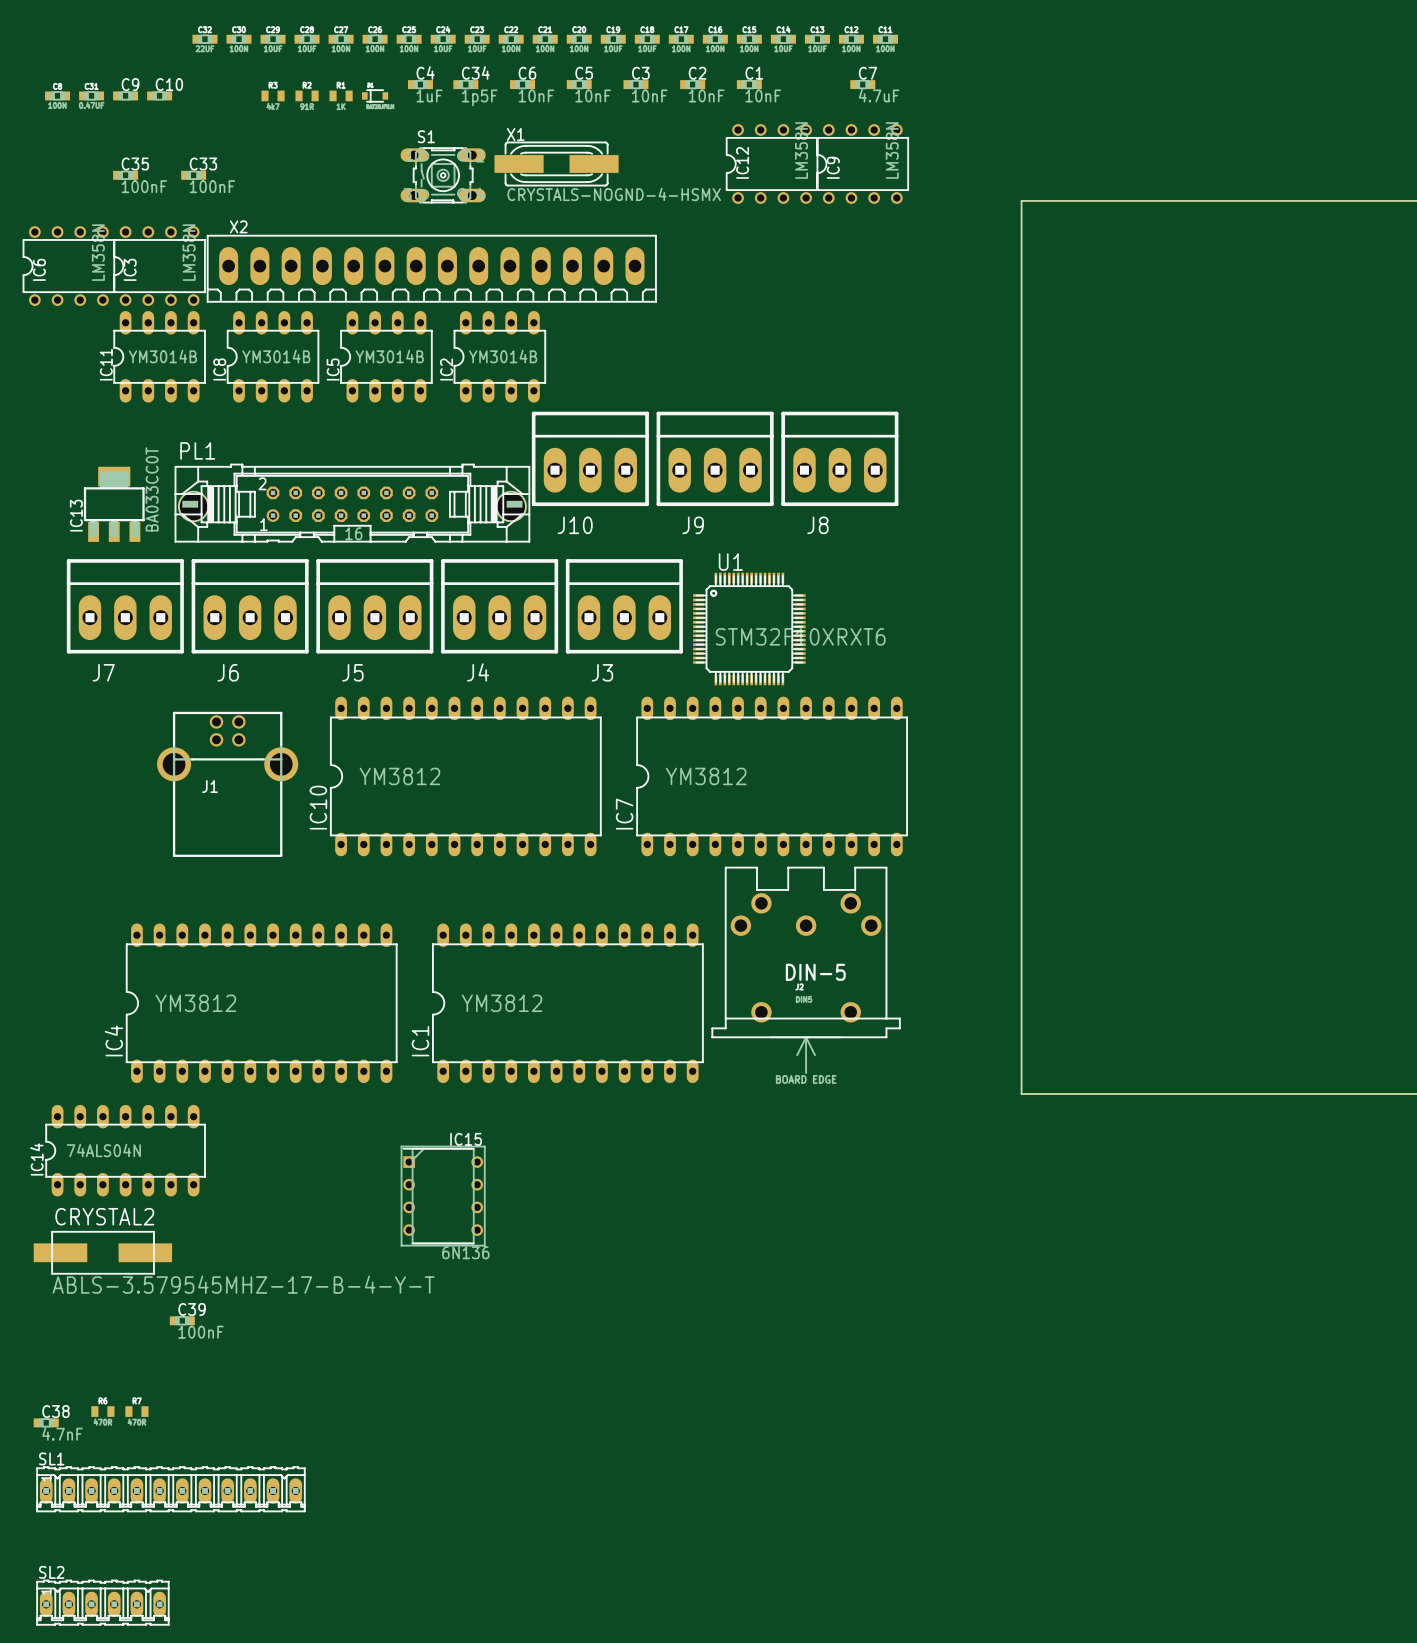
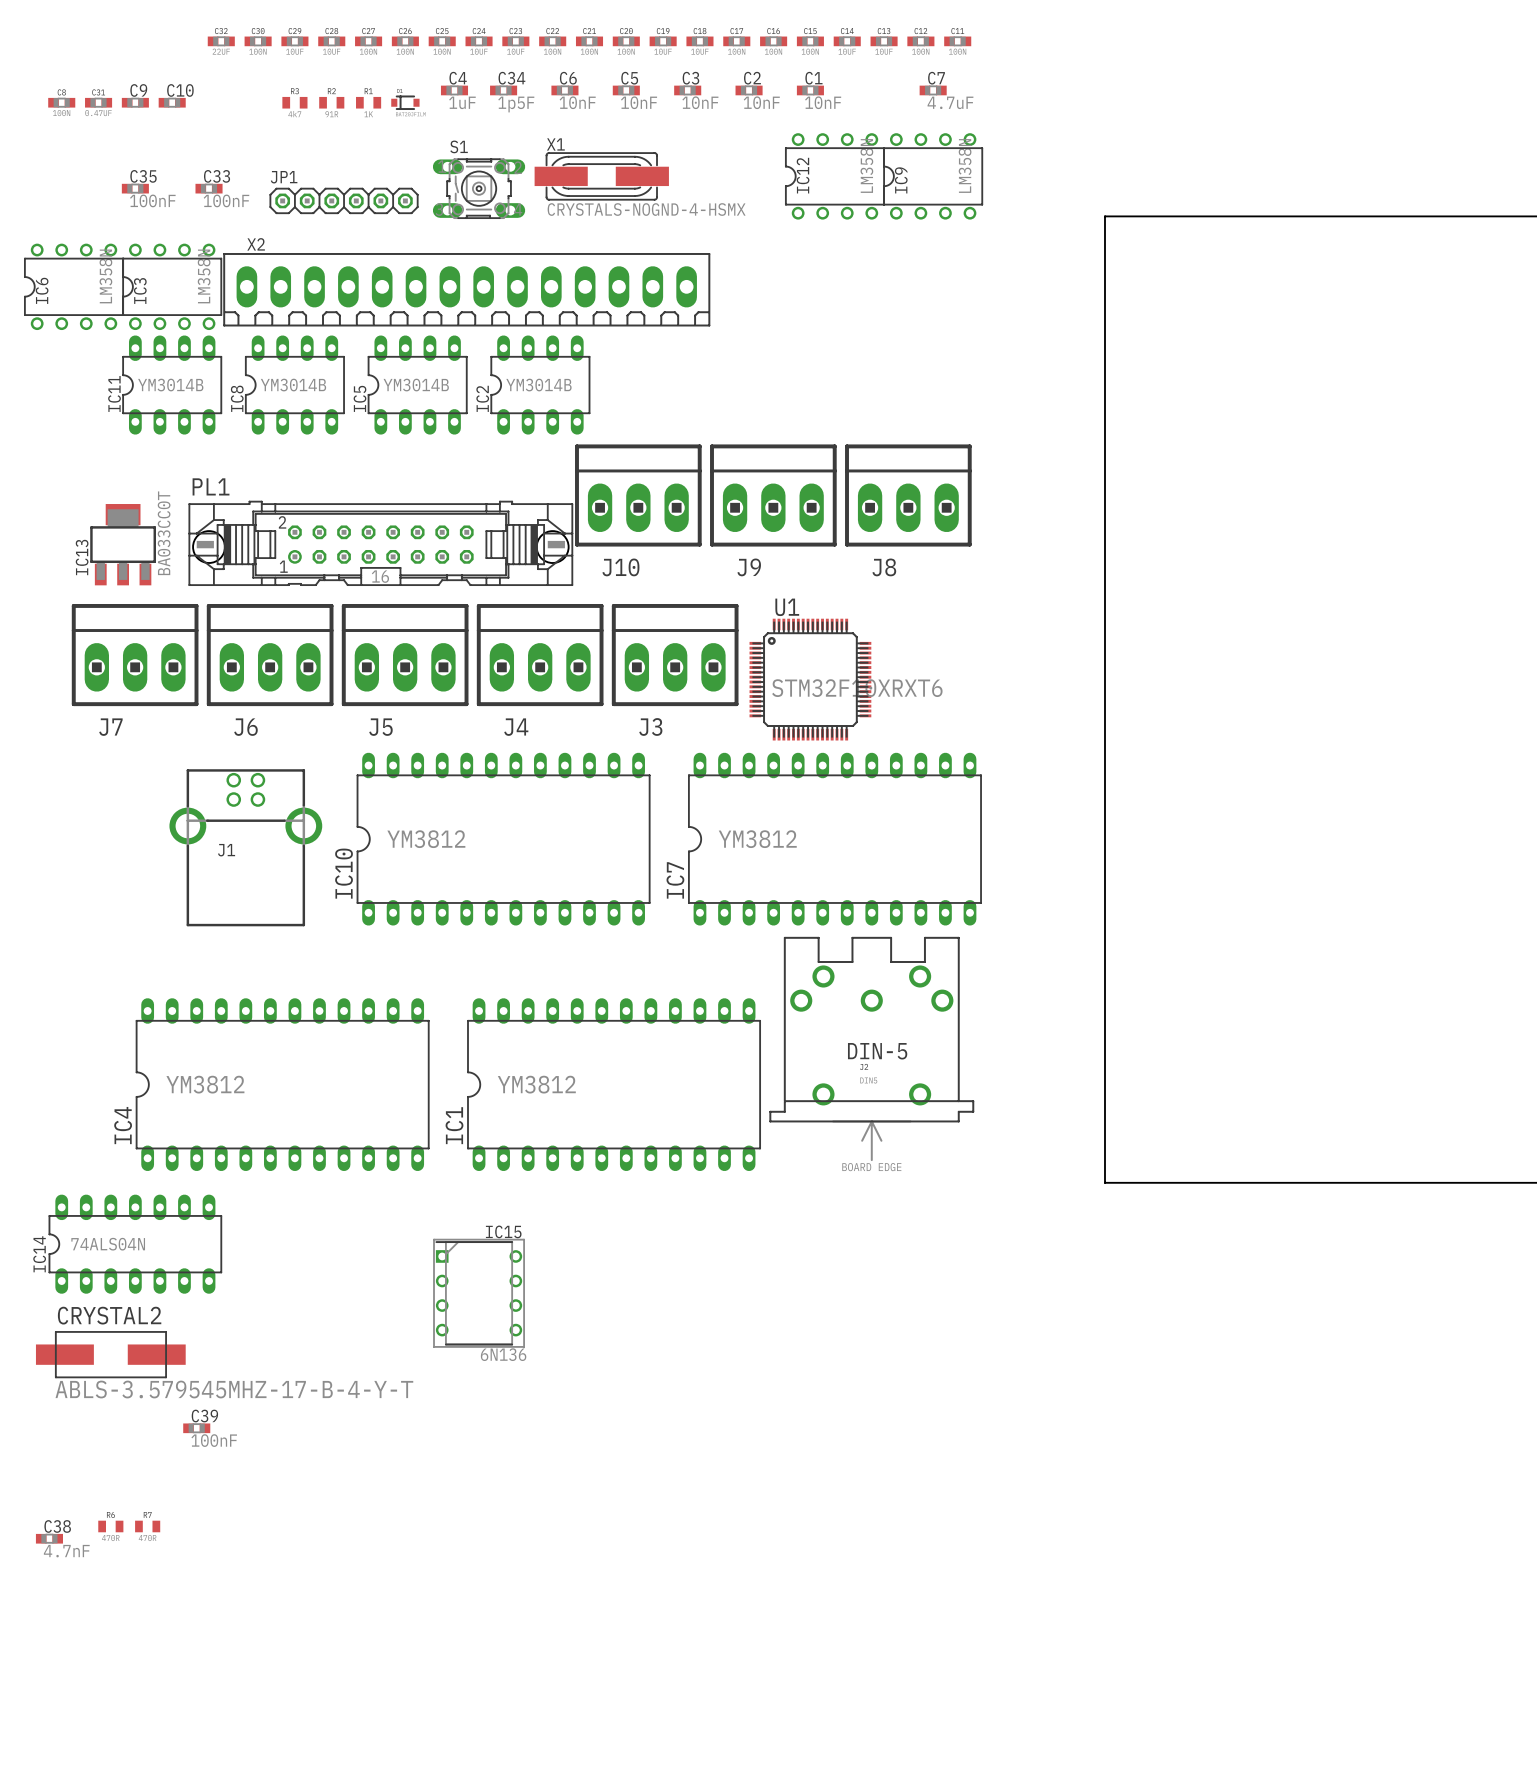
JP1: none -> (344, 200)
SL1: (170, 1489) -> none
SL2: (102, 1602) -> none

